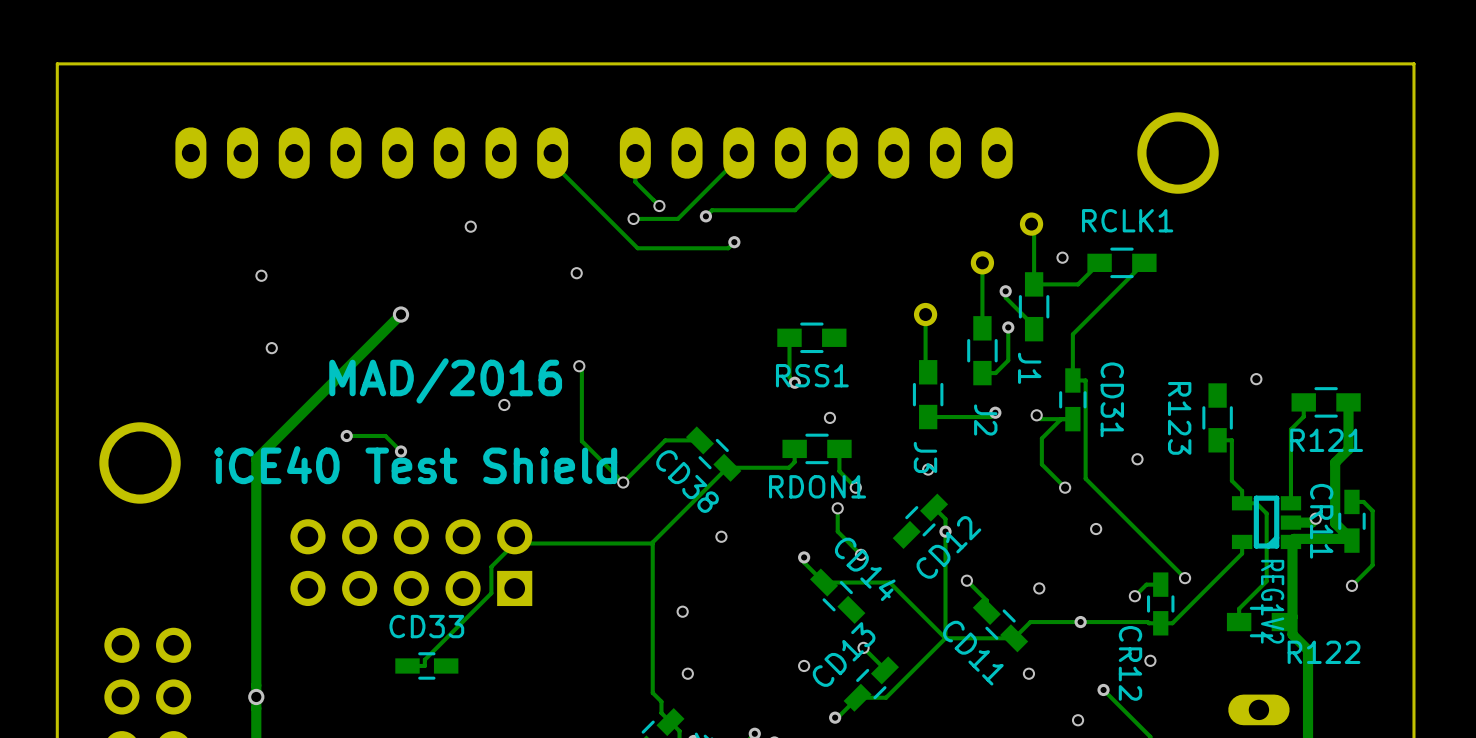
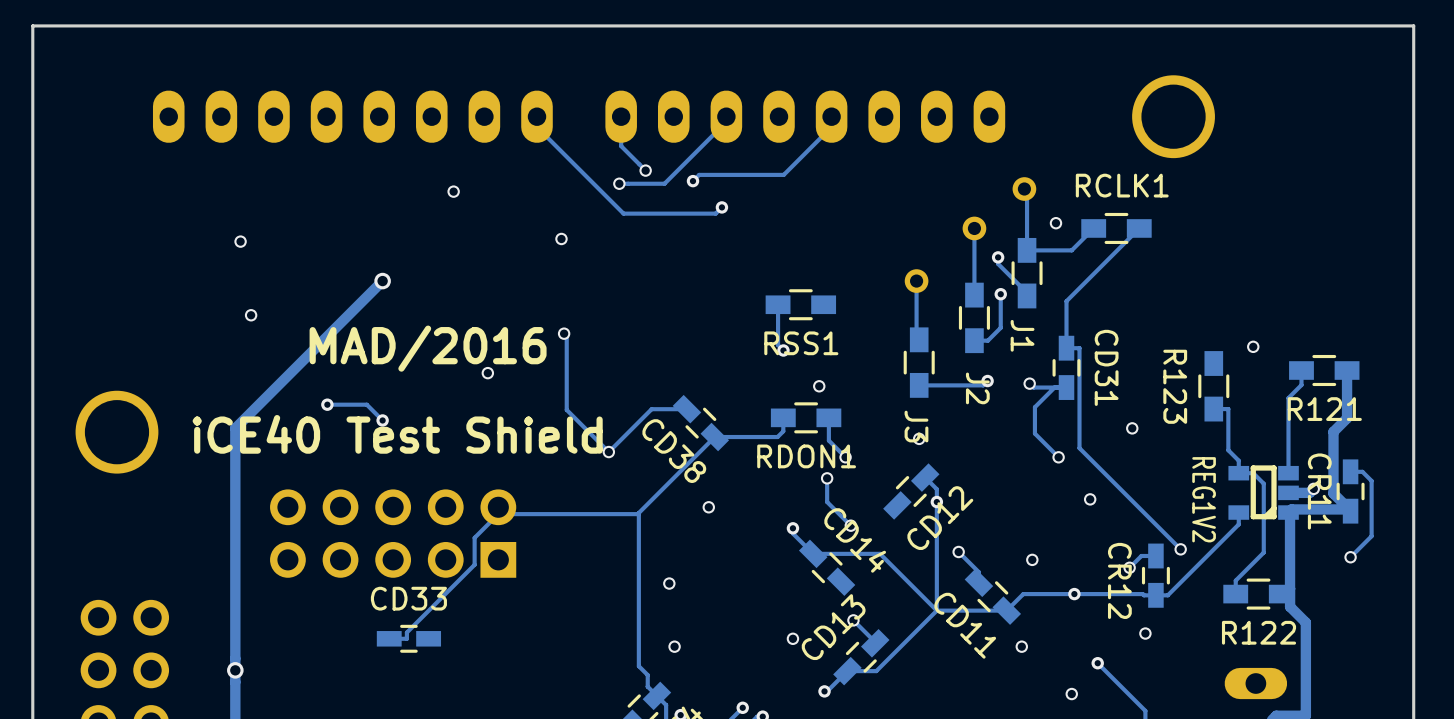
REG1V2 name position: REG1V2 (1272, 601) -> REG1V2 (1204, 499)
R122 name position: R122 (1324, 652) -> R122 (1259, 632)
CR12 name position: CR12 (1130, 663) -> CR12 (1119, 580)

